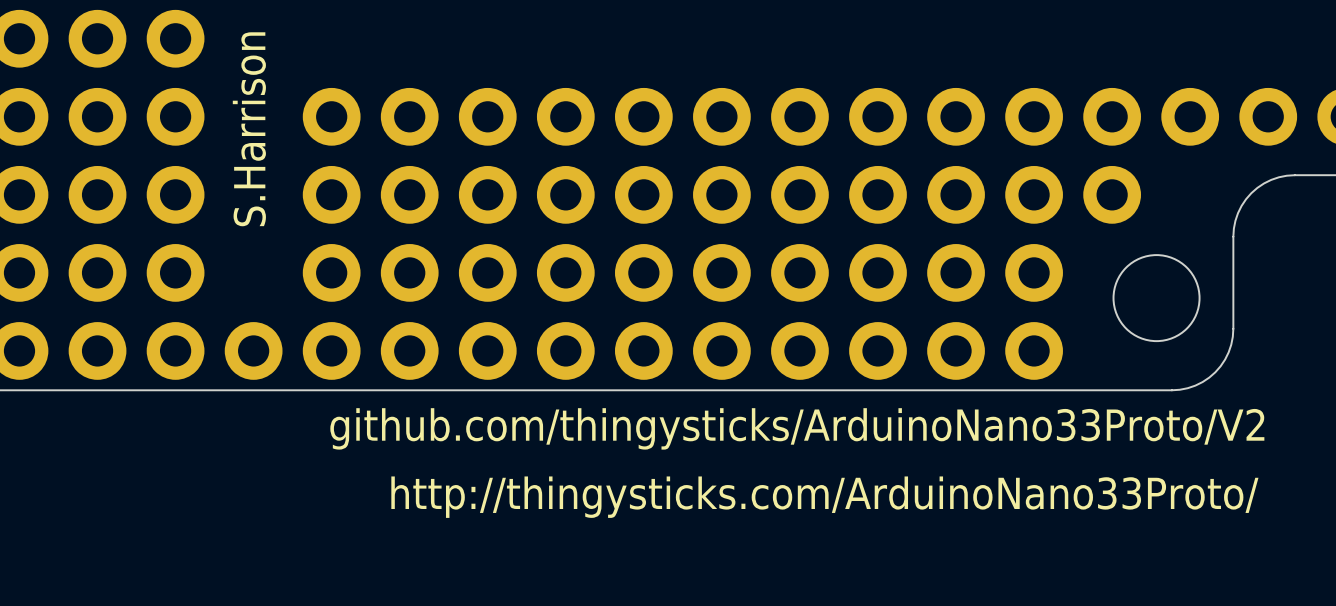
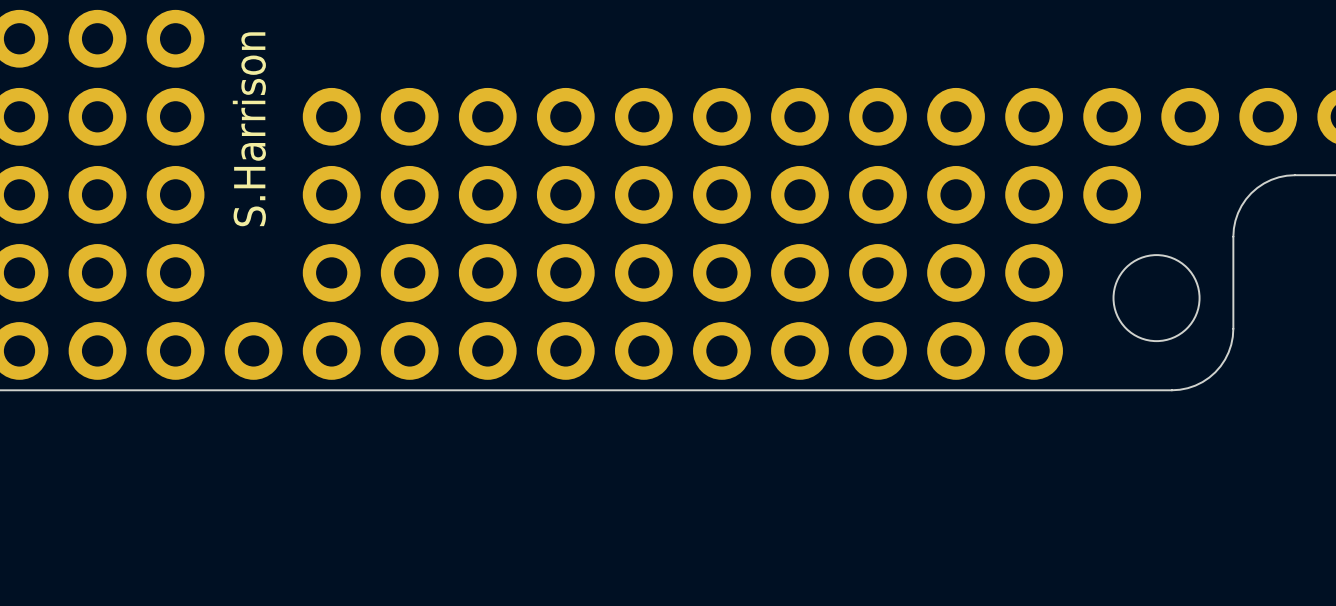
text: github.com/thingysticks/ArduinoNano33Proto/V2 (797, 428) -> none
text: http://thingysticks.com/ArduinoNano33Proto/ (824, 497) -> none

